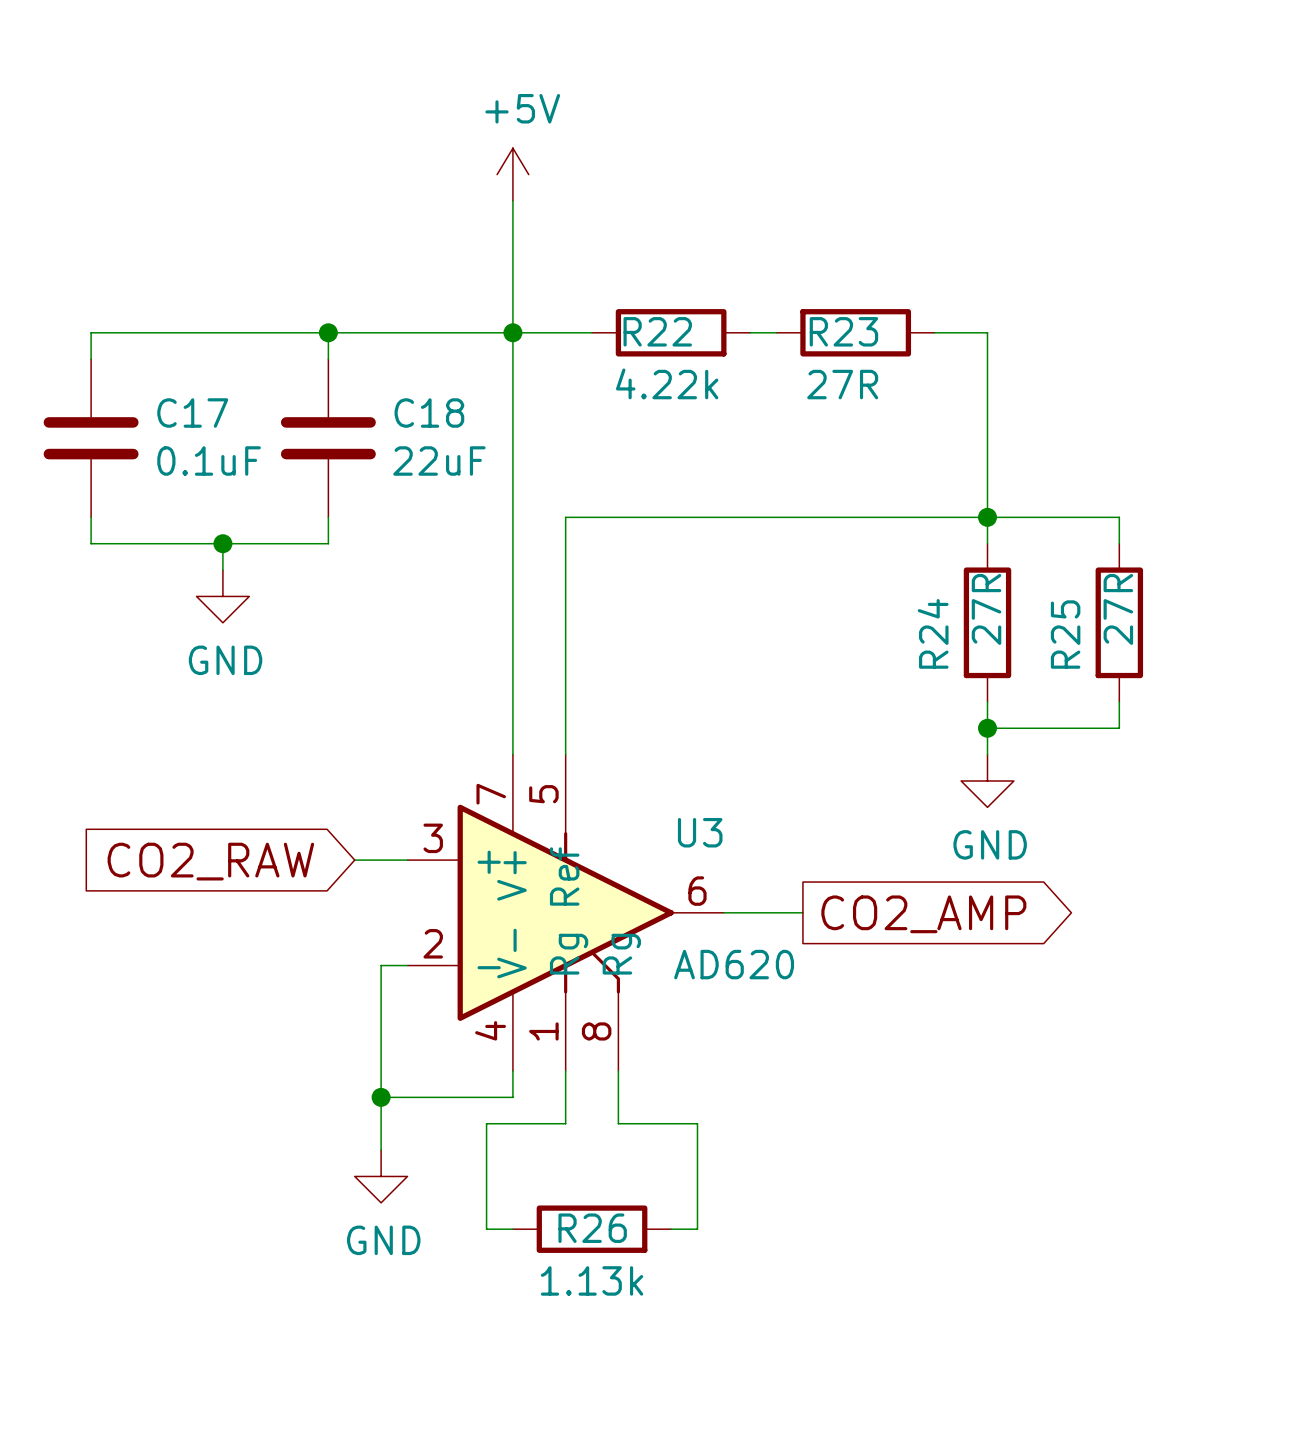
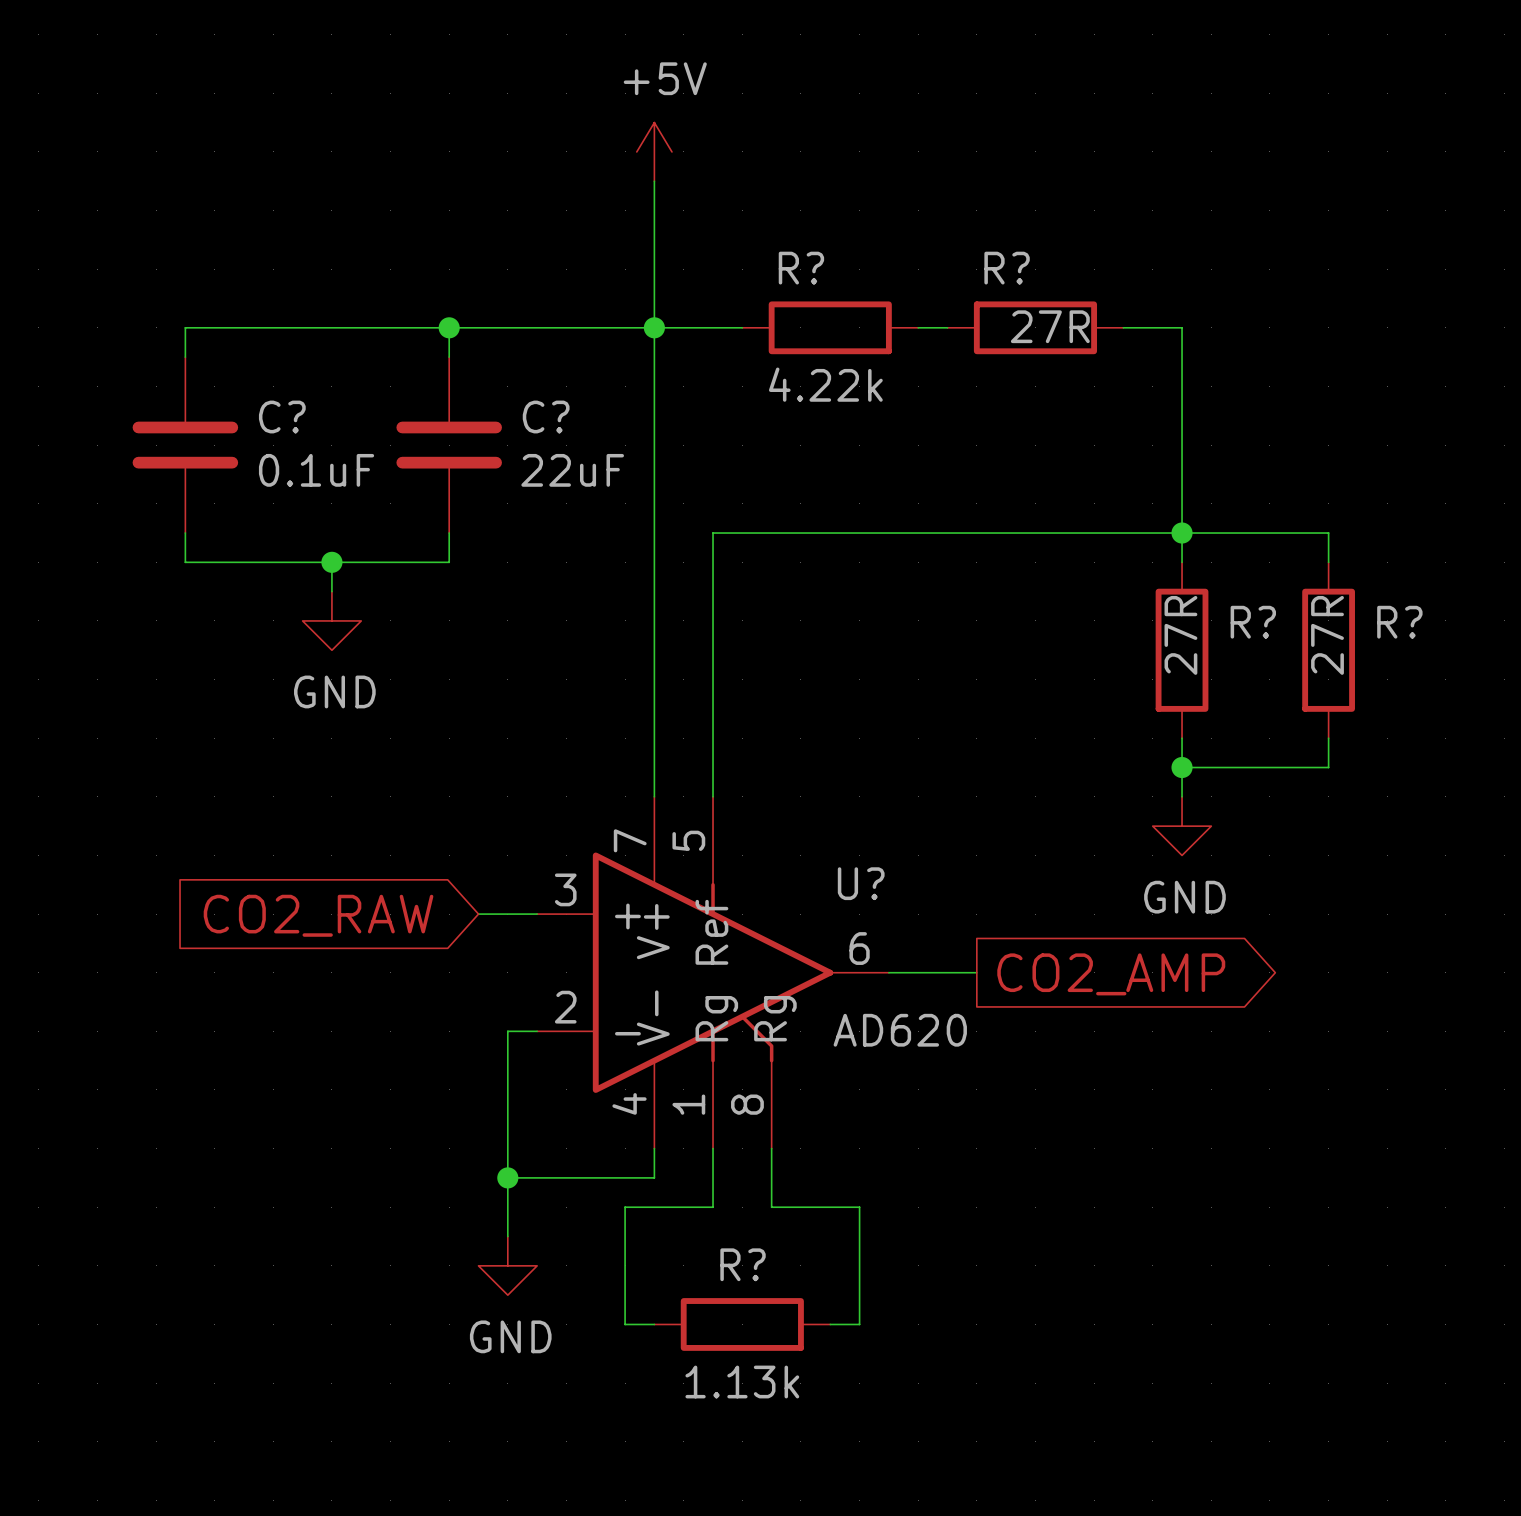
R22 name: R22 (657, 331) -> R? (801, 268)
R23 name: R23 (843, 331) -> R? (1007, 268)
R23 value position: 27R (842, 384) -> 27R (1050, 326)
C17 name: C17 (192, 413) -> C? (282, 417)
C18 name: C18 (429, 413) -> C? (546, 417)
R24 name: R24 (933, 633) -> R? (1253, 622)
R25 name: R25 (1065, 634) -> R? (1399, 622)
U3 name: U3 (700, 832) -> U? (861, 883)
R26 name: R26 (592, 1228) -> R? (743, 1264)

